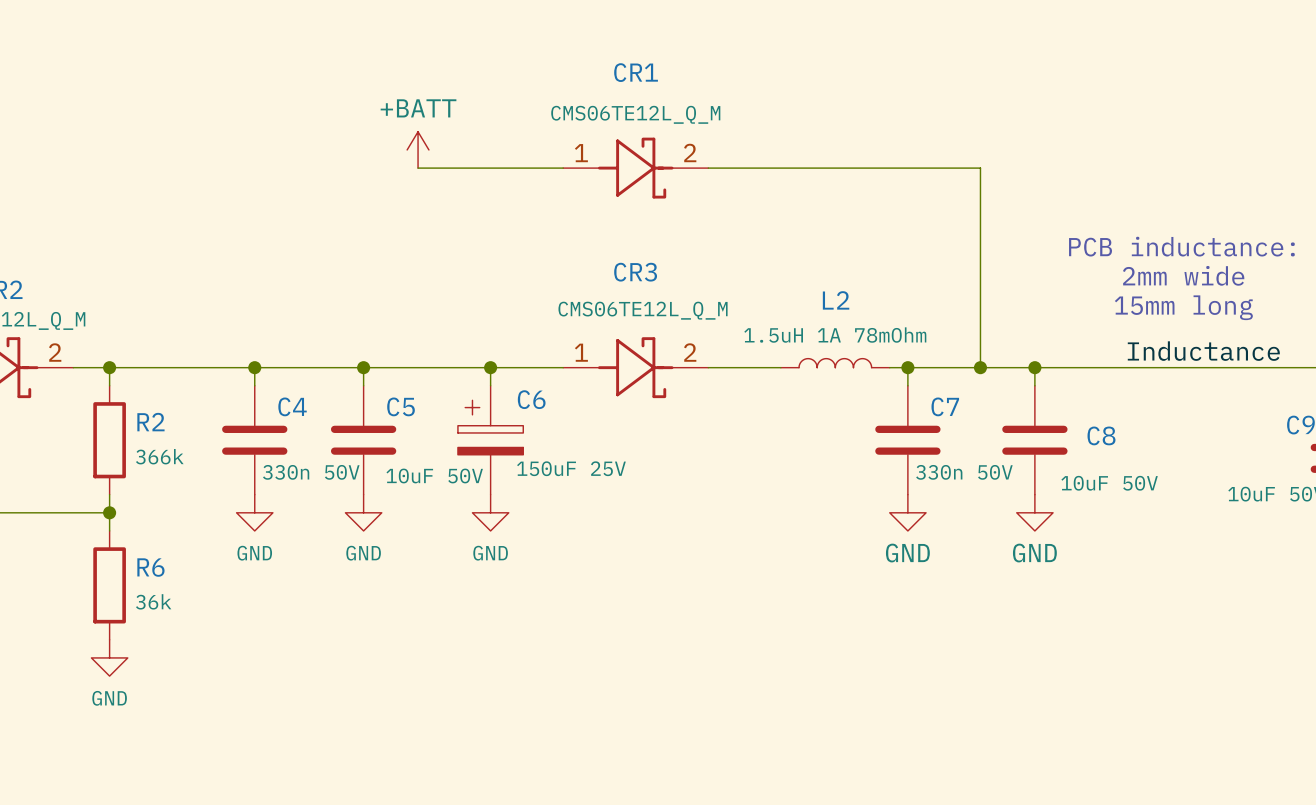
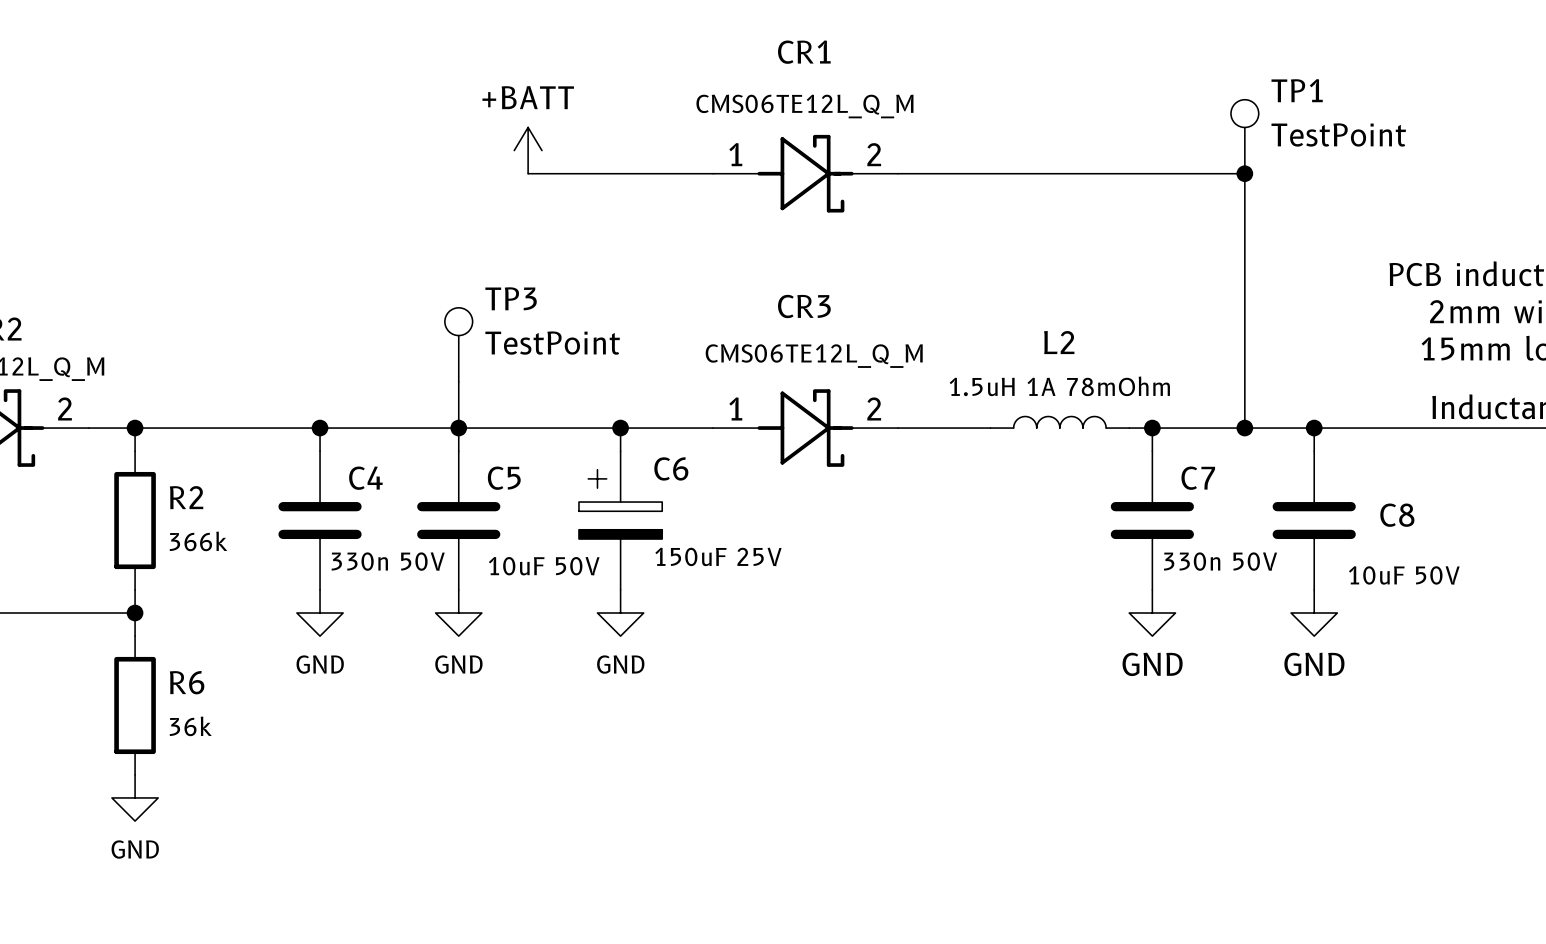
TP1: none -> TestPoint (1244, 136)
junction: none -> (1244, 173)
TP3: none -> TestPoint (458, 344)
wire: none -> (458, 381) (458, 428)

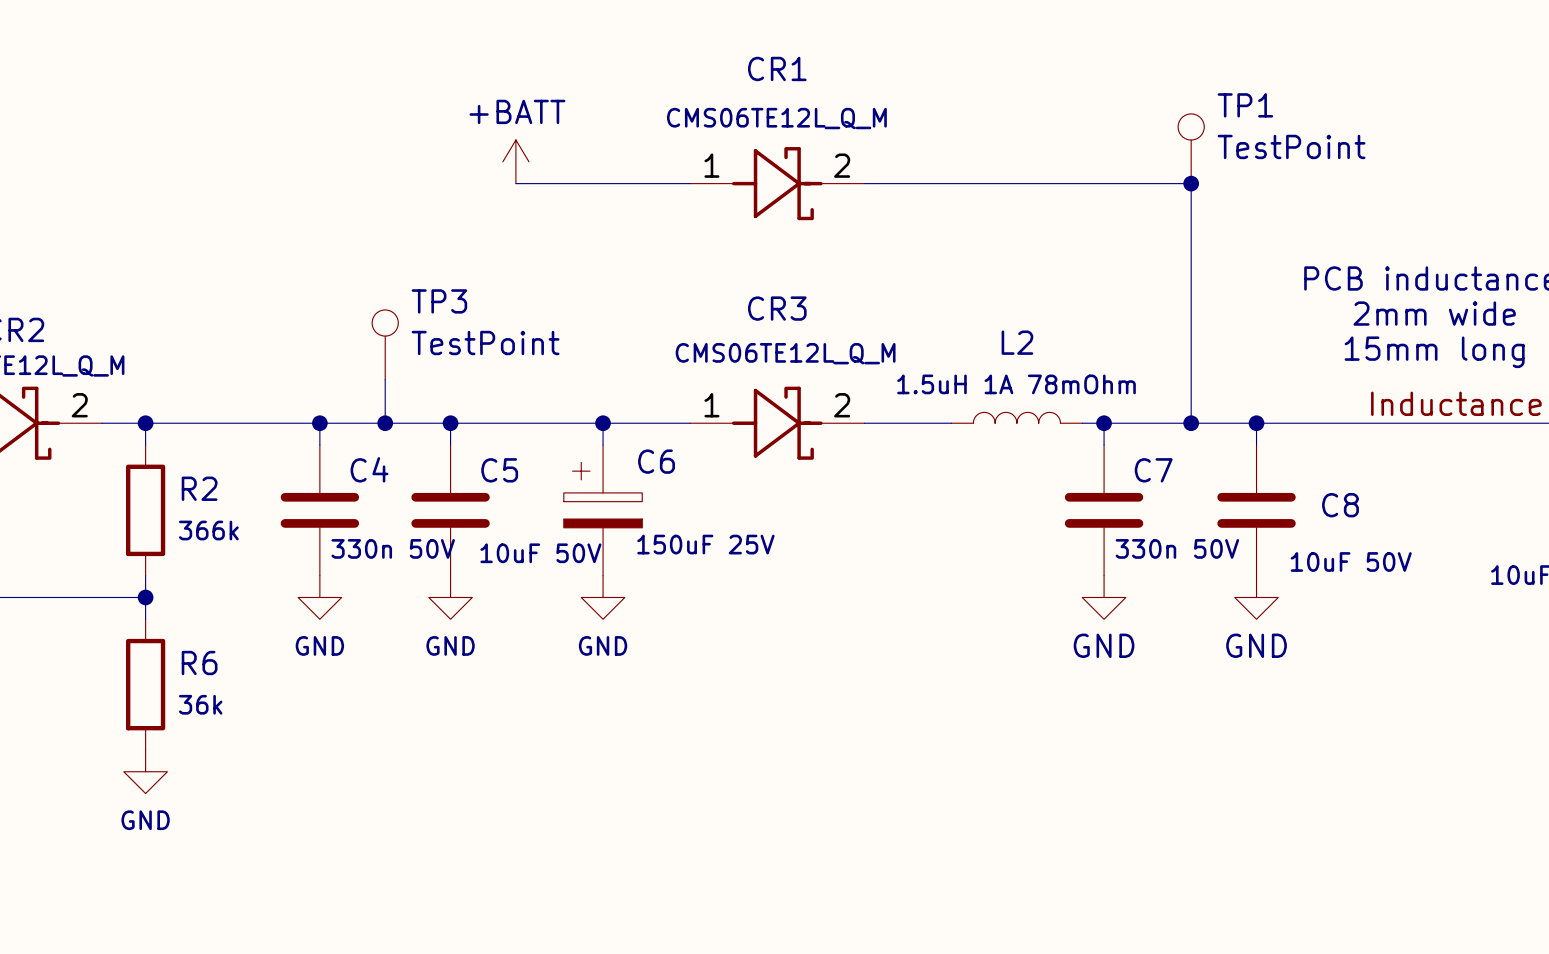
TP3 position: (458, 344) -> (385, 344)
wire: (458, 381) (458, 428) -> (385, 379) (385, 423)
junction: none -> (385, 423)

